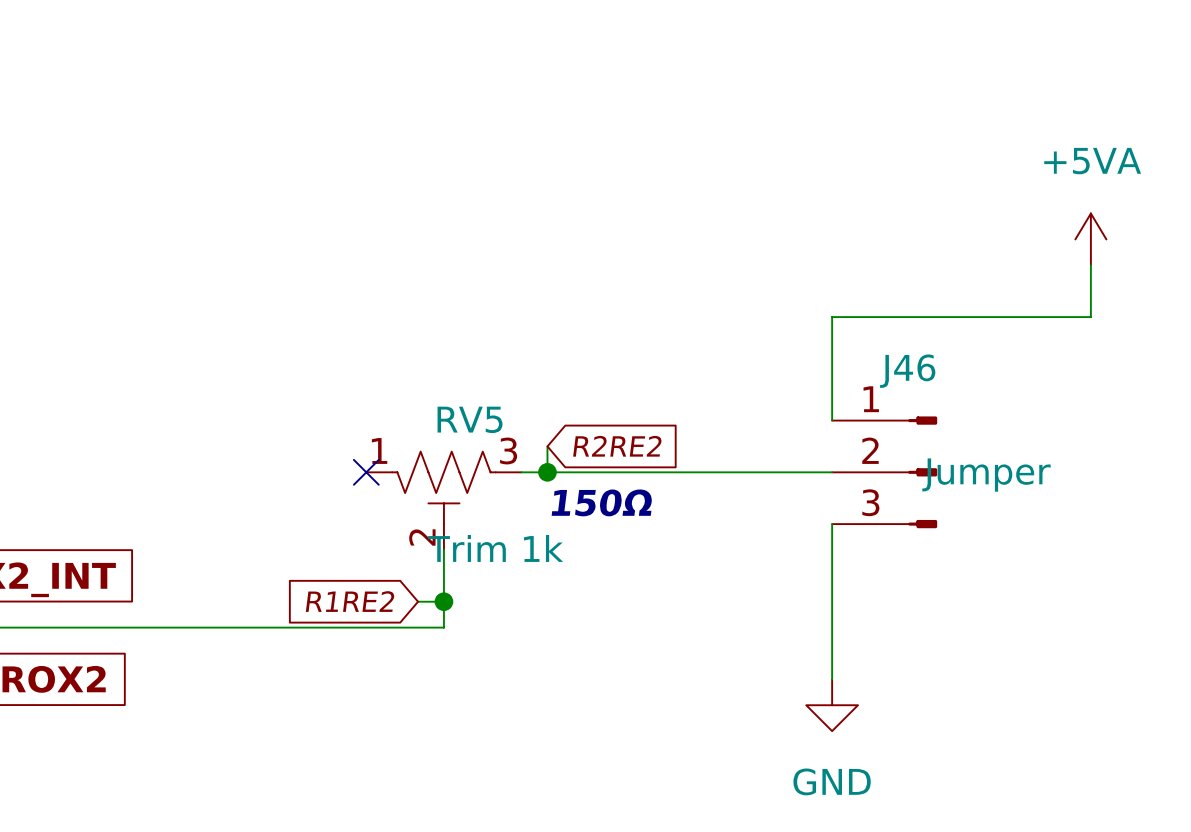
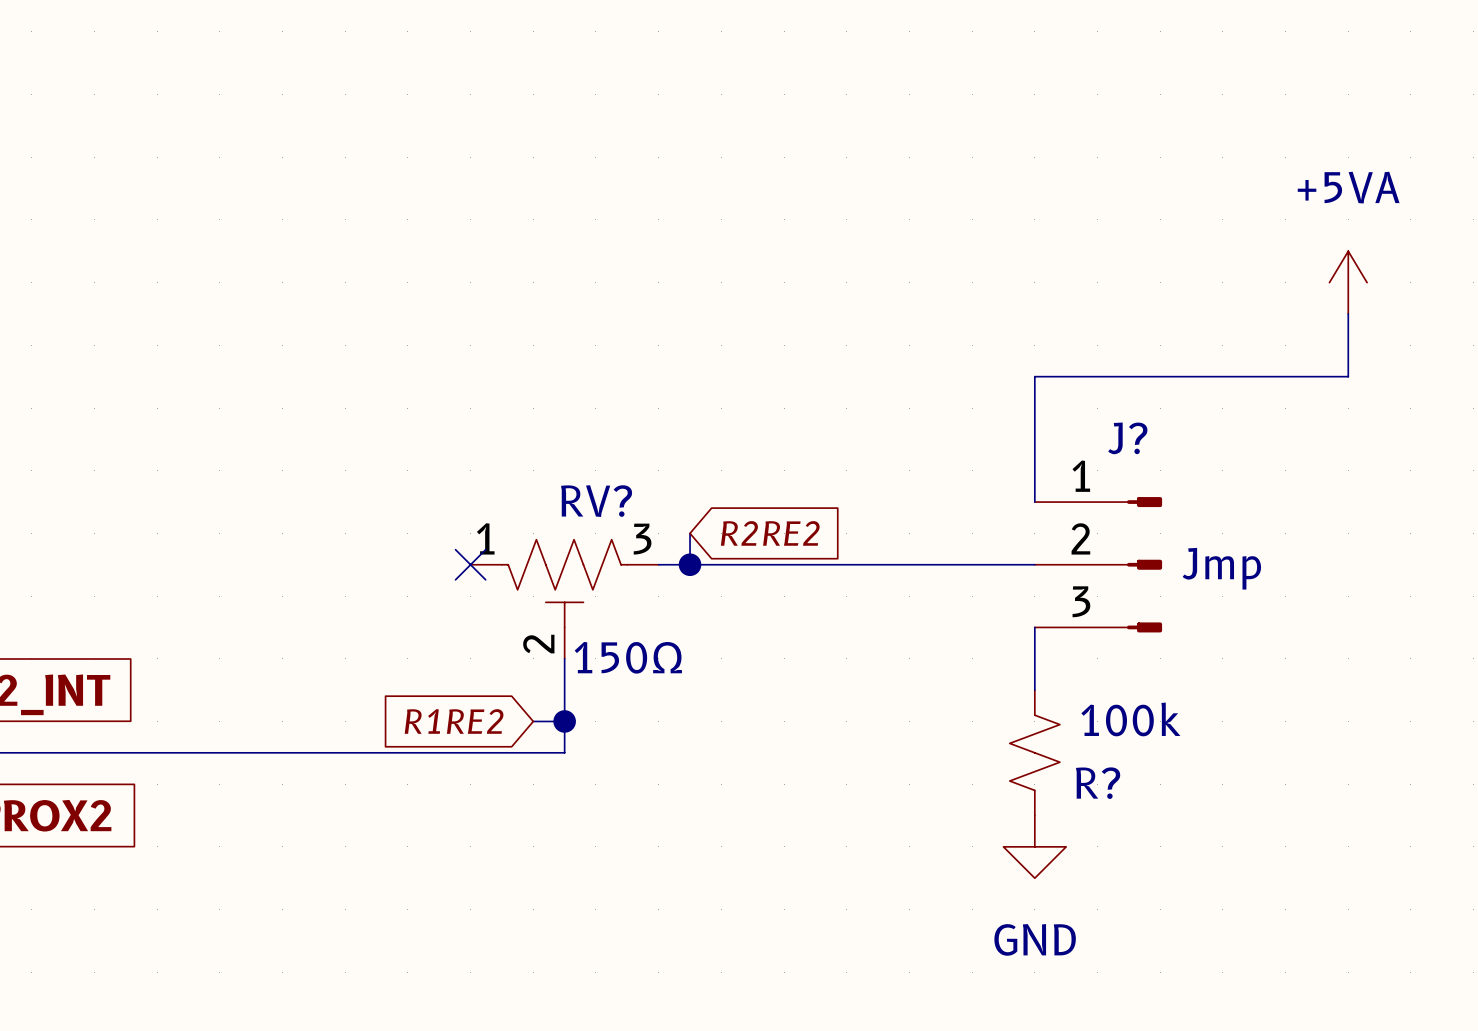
J46 name: J46 (907, 371) -> J? (1127, 438)
RV5 name: RV5 (470, 419) -> RV? (596, 501)
J46 value: Jumper (986, 475) -> Jmp (1221, 568)
text: 150Ω (601, 502) -> none
RV5 value: Trim 1k (495, 548) -> 150Ω (628, 657)
wire: (832, 575) (832, 679) -> none
R?: none -> 100k (1034, 752)

